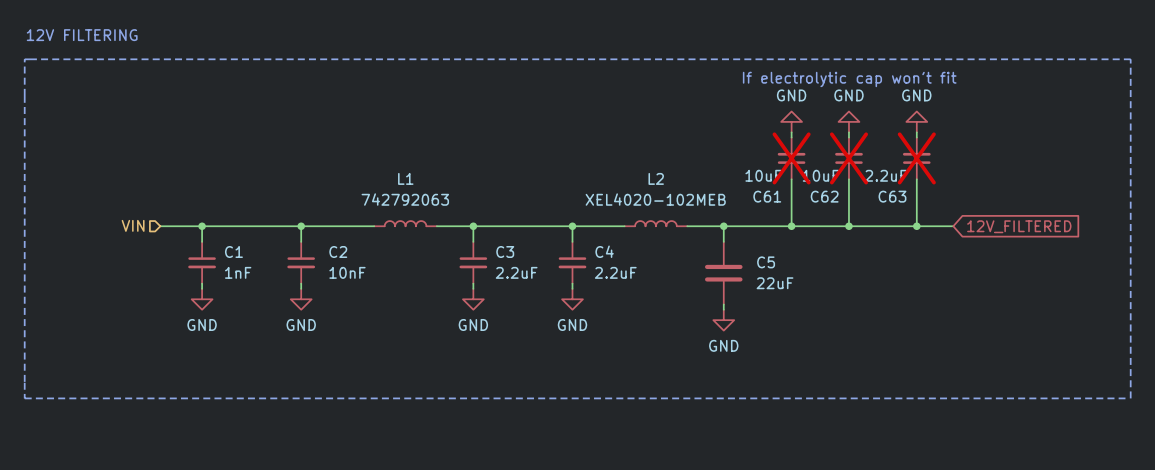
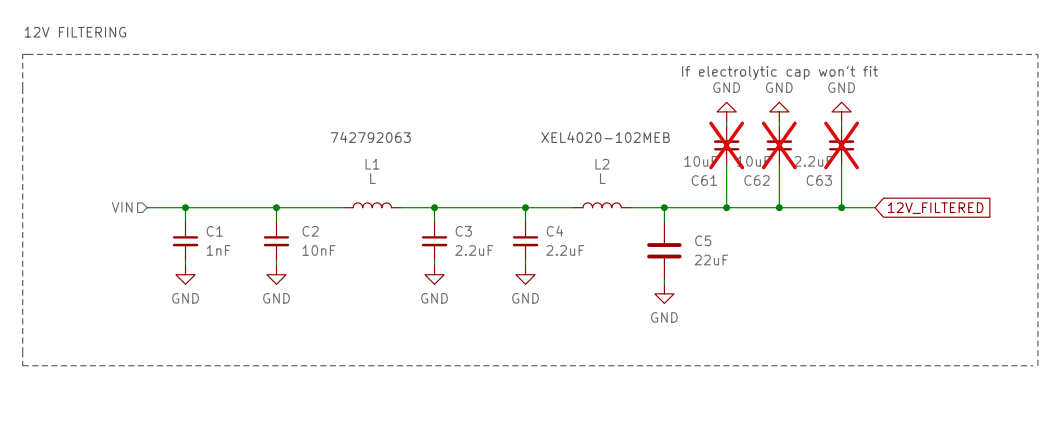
text: none -> 742792063 (370, 137)
text: none -> XEL4020-102MEB (605, 137)
L1 value: 742792063 (405, 199) -> L (372, 178)
L2 value: XEL4020-102MEB (655, 199) -> L (602, 178)

